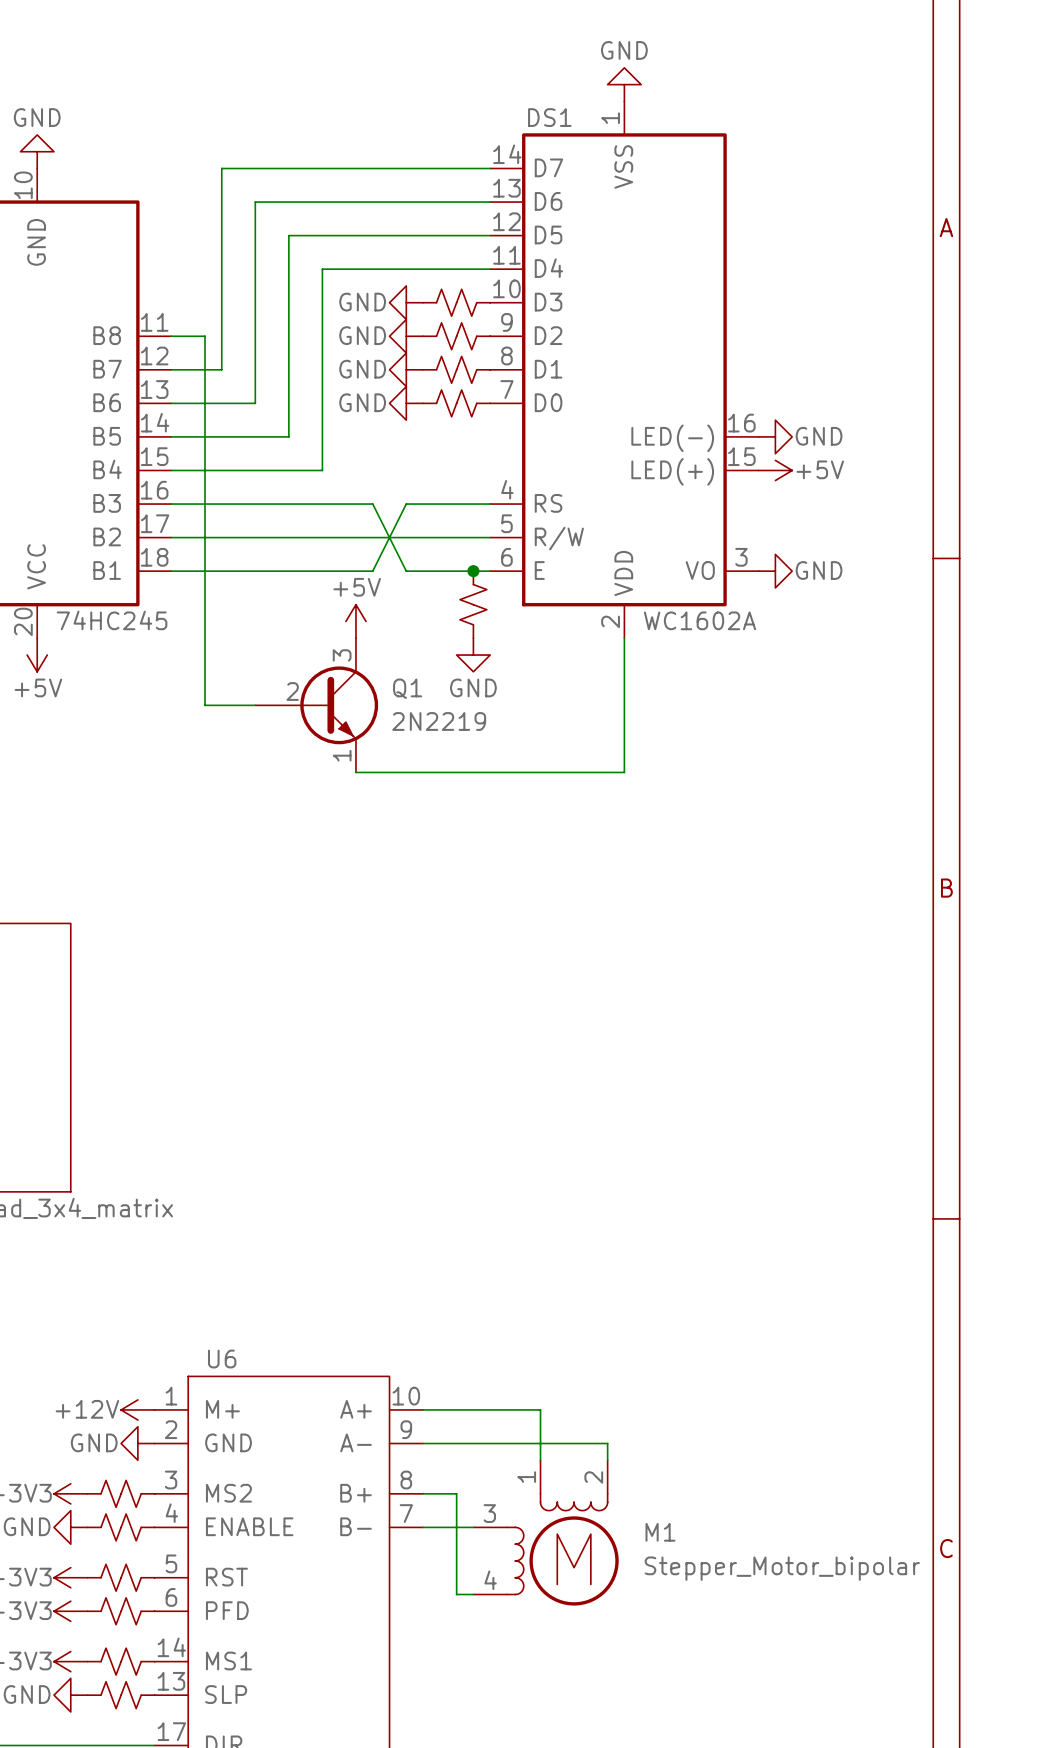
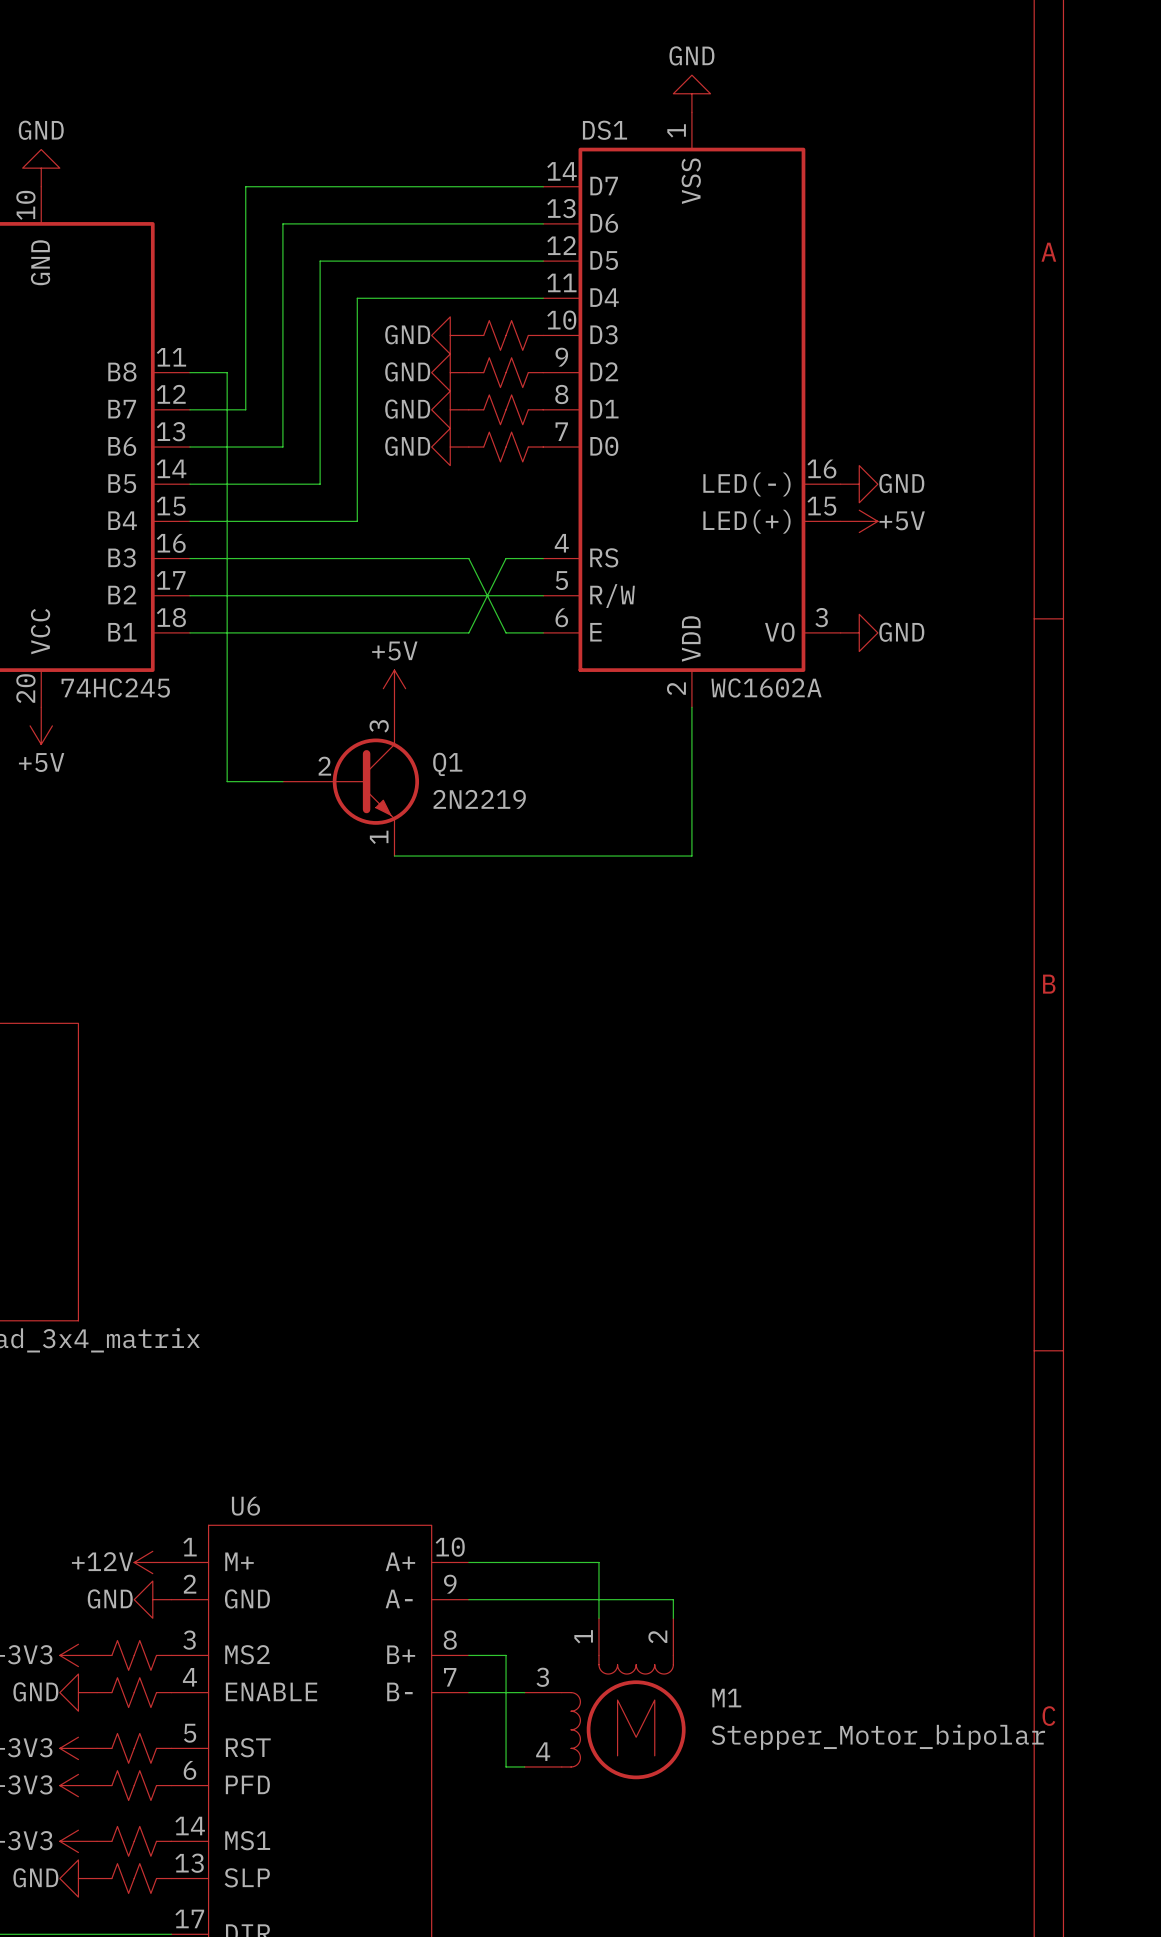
wire: (372, 504) (406, 571) -> (413, 558) (450, 558)
wire: (406, 504) (372, 571) -> (450, 632) (413, 632)
wire: (423, 504) (456, 504) -> (468, 558) (506, 632)
wire: (423, 571) (456, 571) -> (468, 632) (506, 558)
junction: (473, 571) -> none
part: (473, 604) -> none
power symbol: GND (473, 655) -> none

